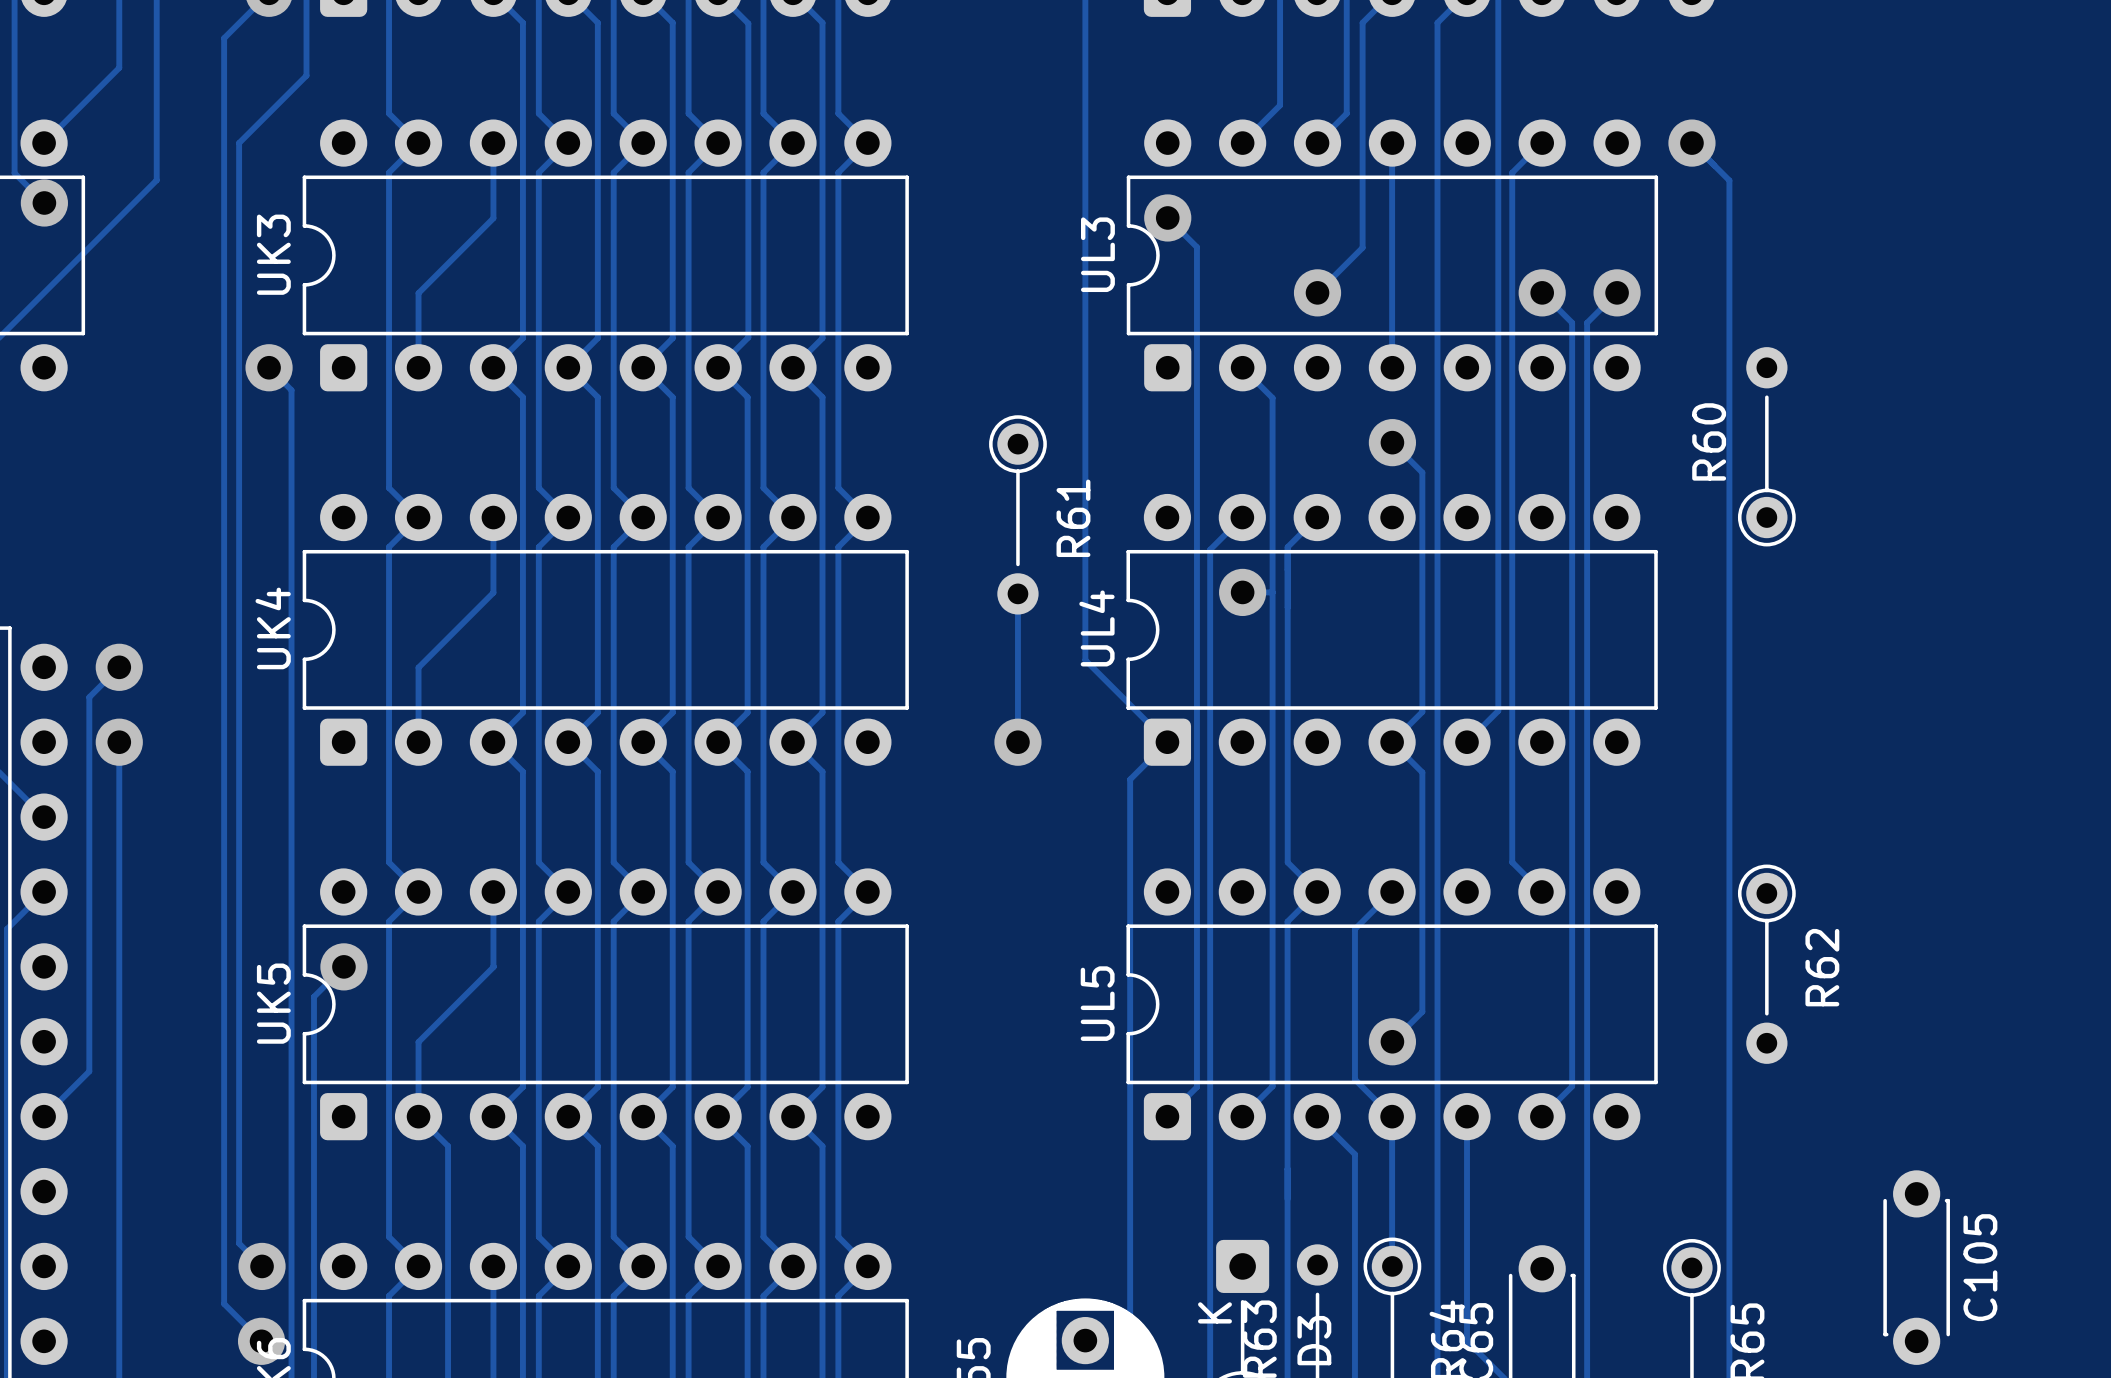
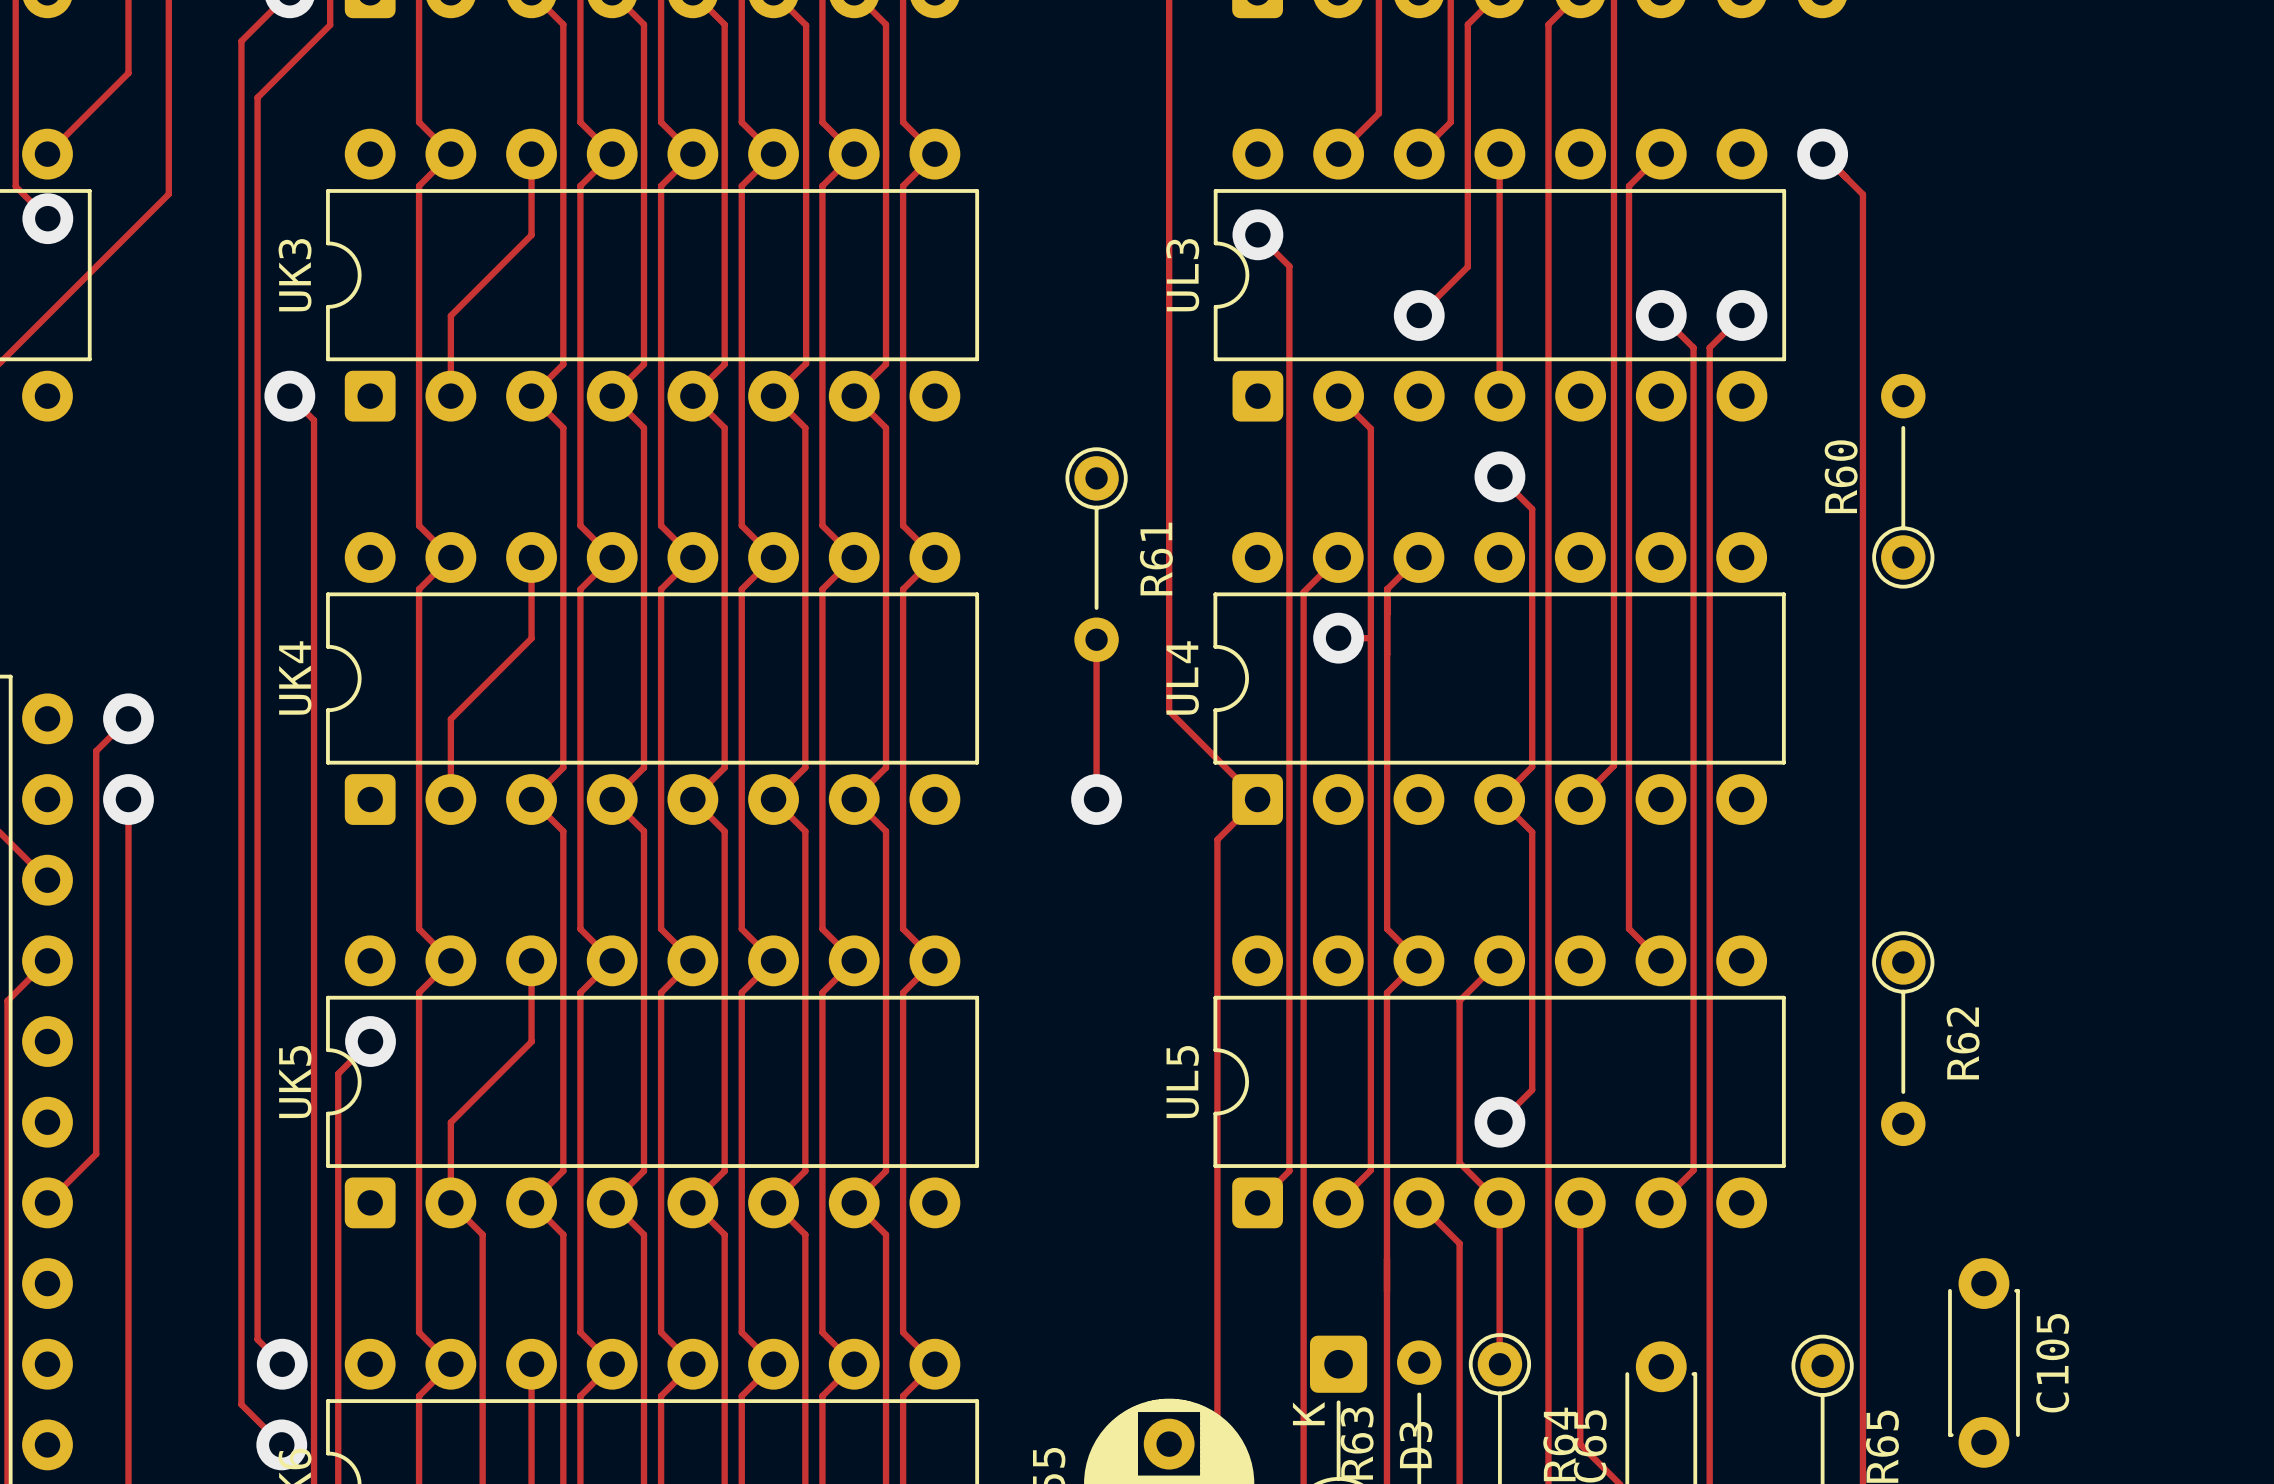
track: (306, 23) (306, 75) (239, 143) -> (330, 25) (257, 97) (257, 154)
C105 position: (1916, 1267) -> (1983, 1362)

